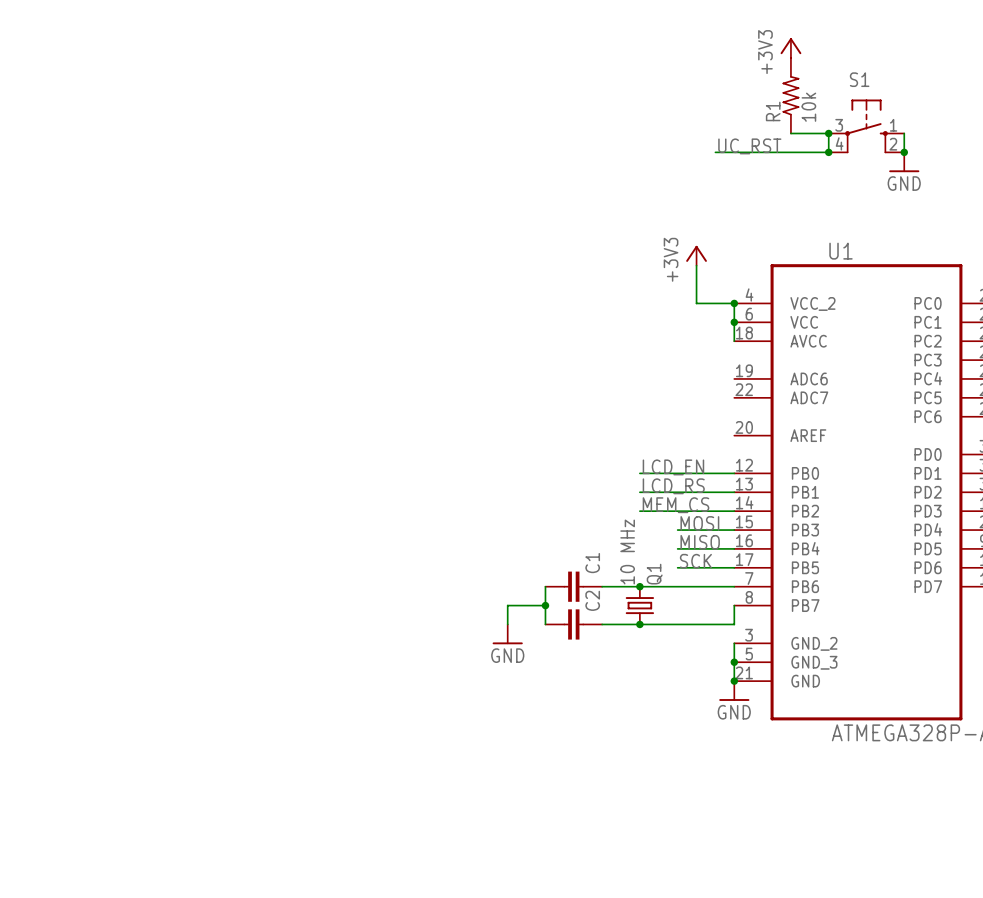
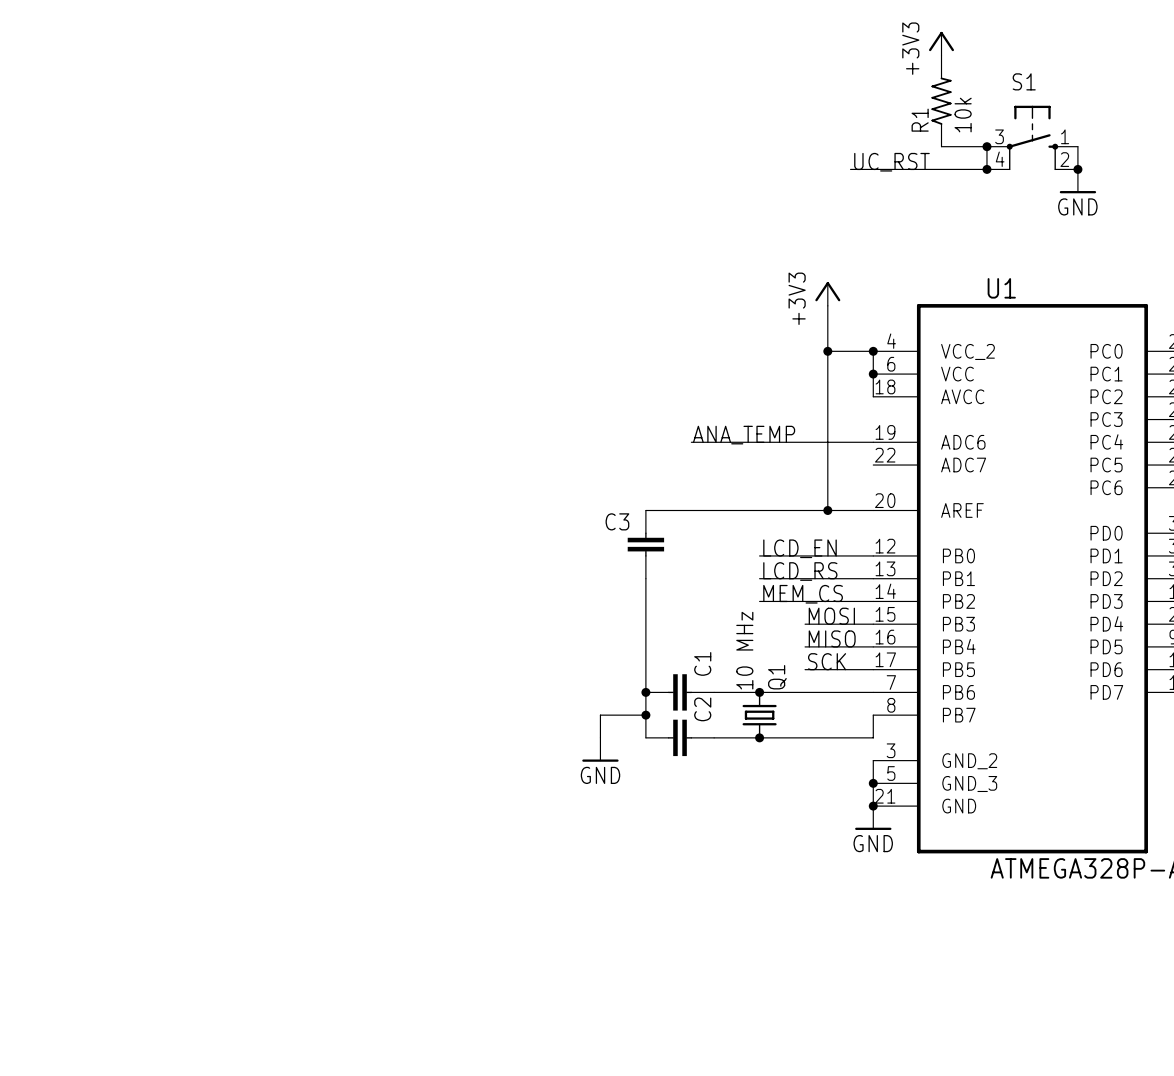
wire: none -> (827, 351) (827, 510)
junction: none -> (827, 351)
label: none -> ANA_TEMP (744, 435)
wire: none -> (691, 442) (873, 442)
wire: none -> (645, 510) (873, 510)
junction: none -> (827, 510)
C3: none -> (645, 544)
wire: none -> (645, 578) (645, 692)
junction: none -> (645, 692)

